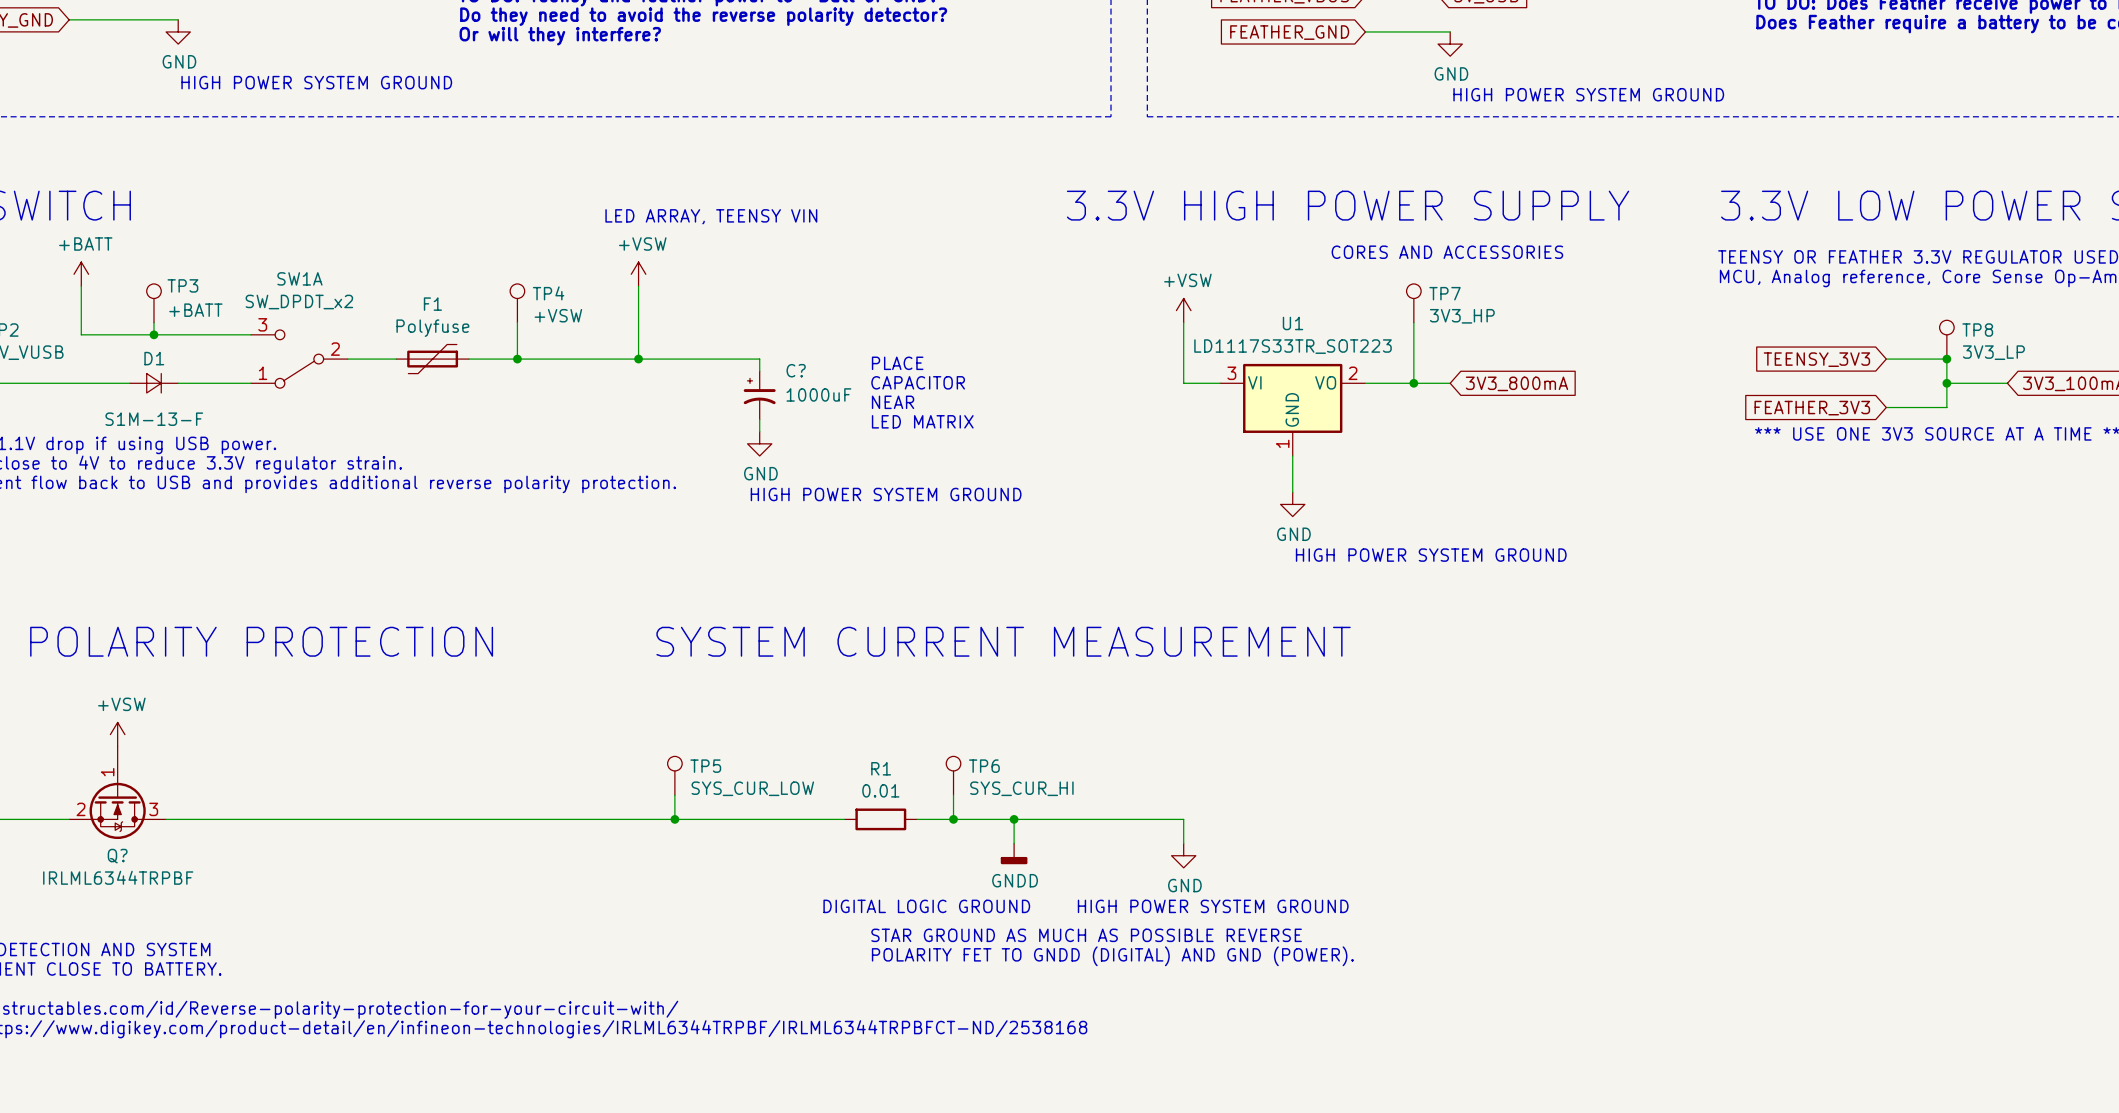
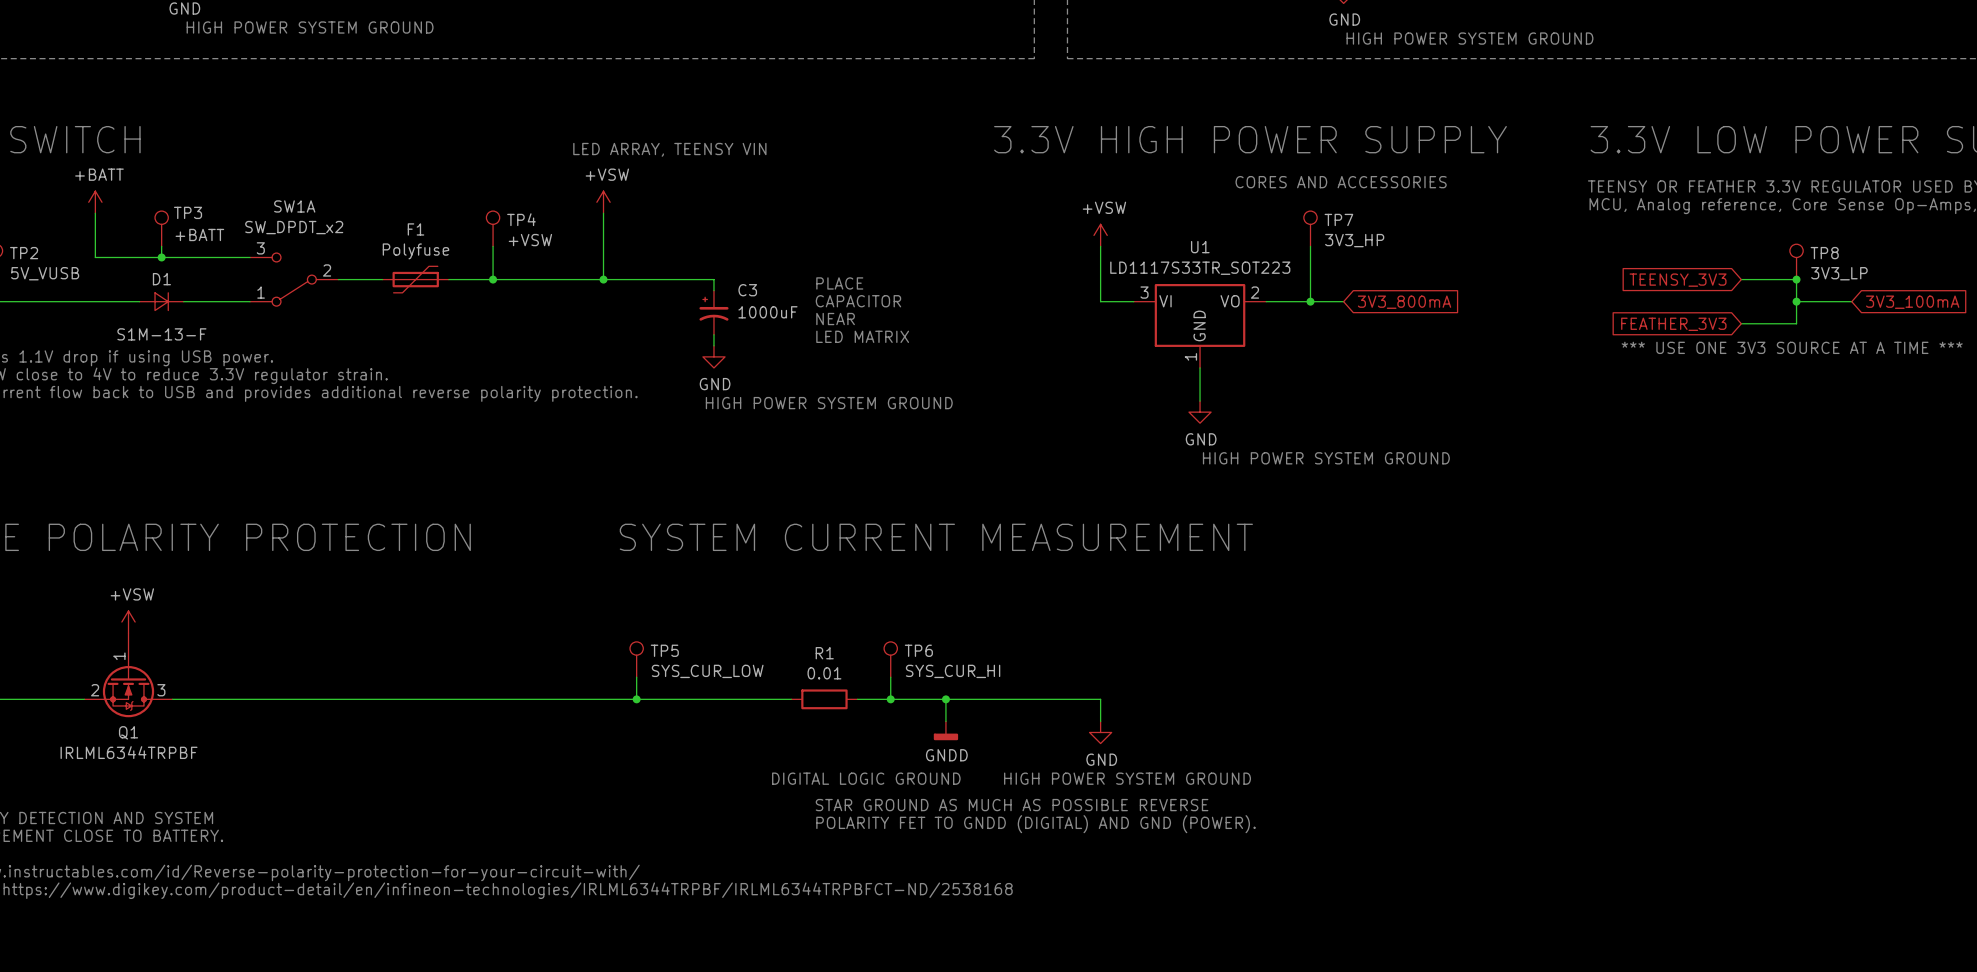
C? name: C? (796, 370) -> C3 (747, 290)
Q? name: Q? (117, 856) -> Q1 (128, 732)

